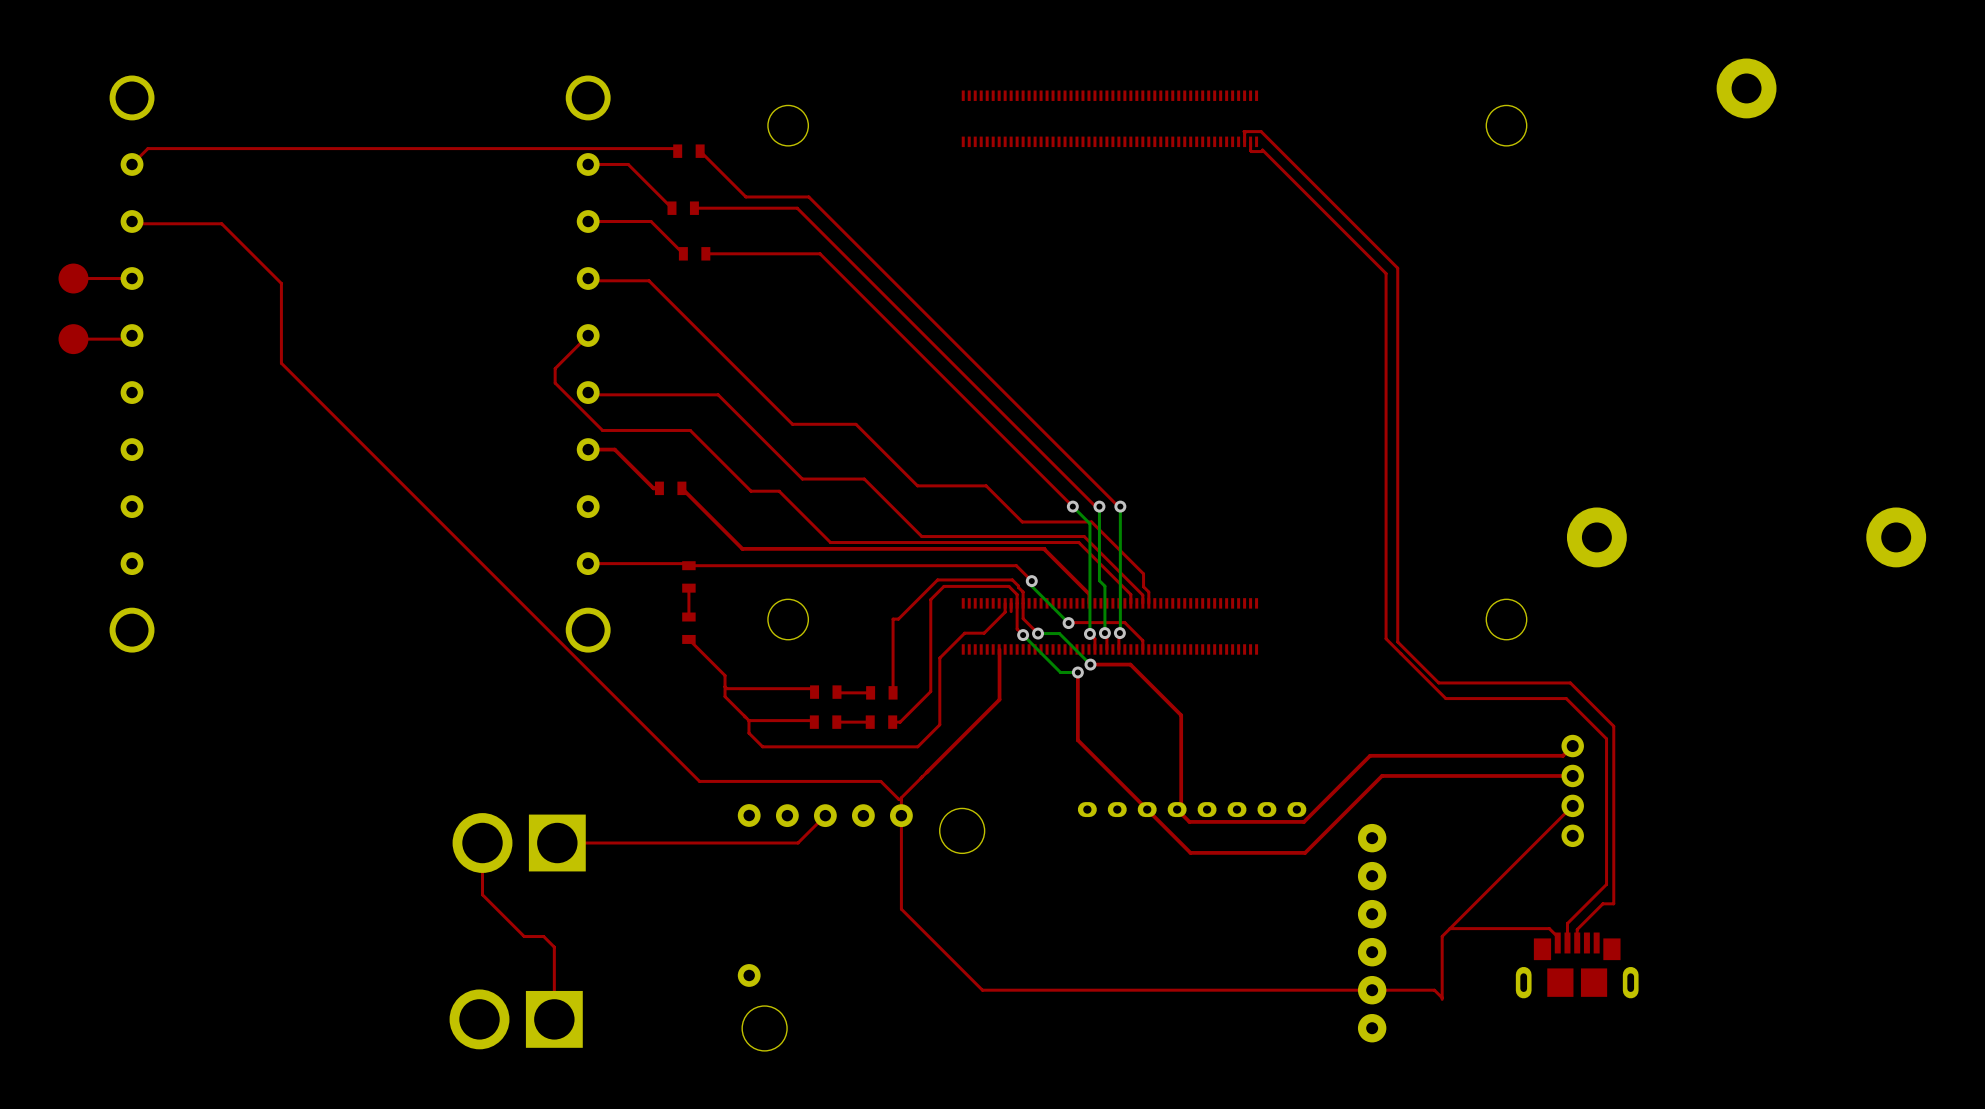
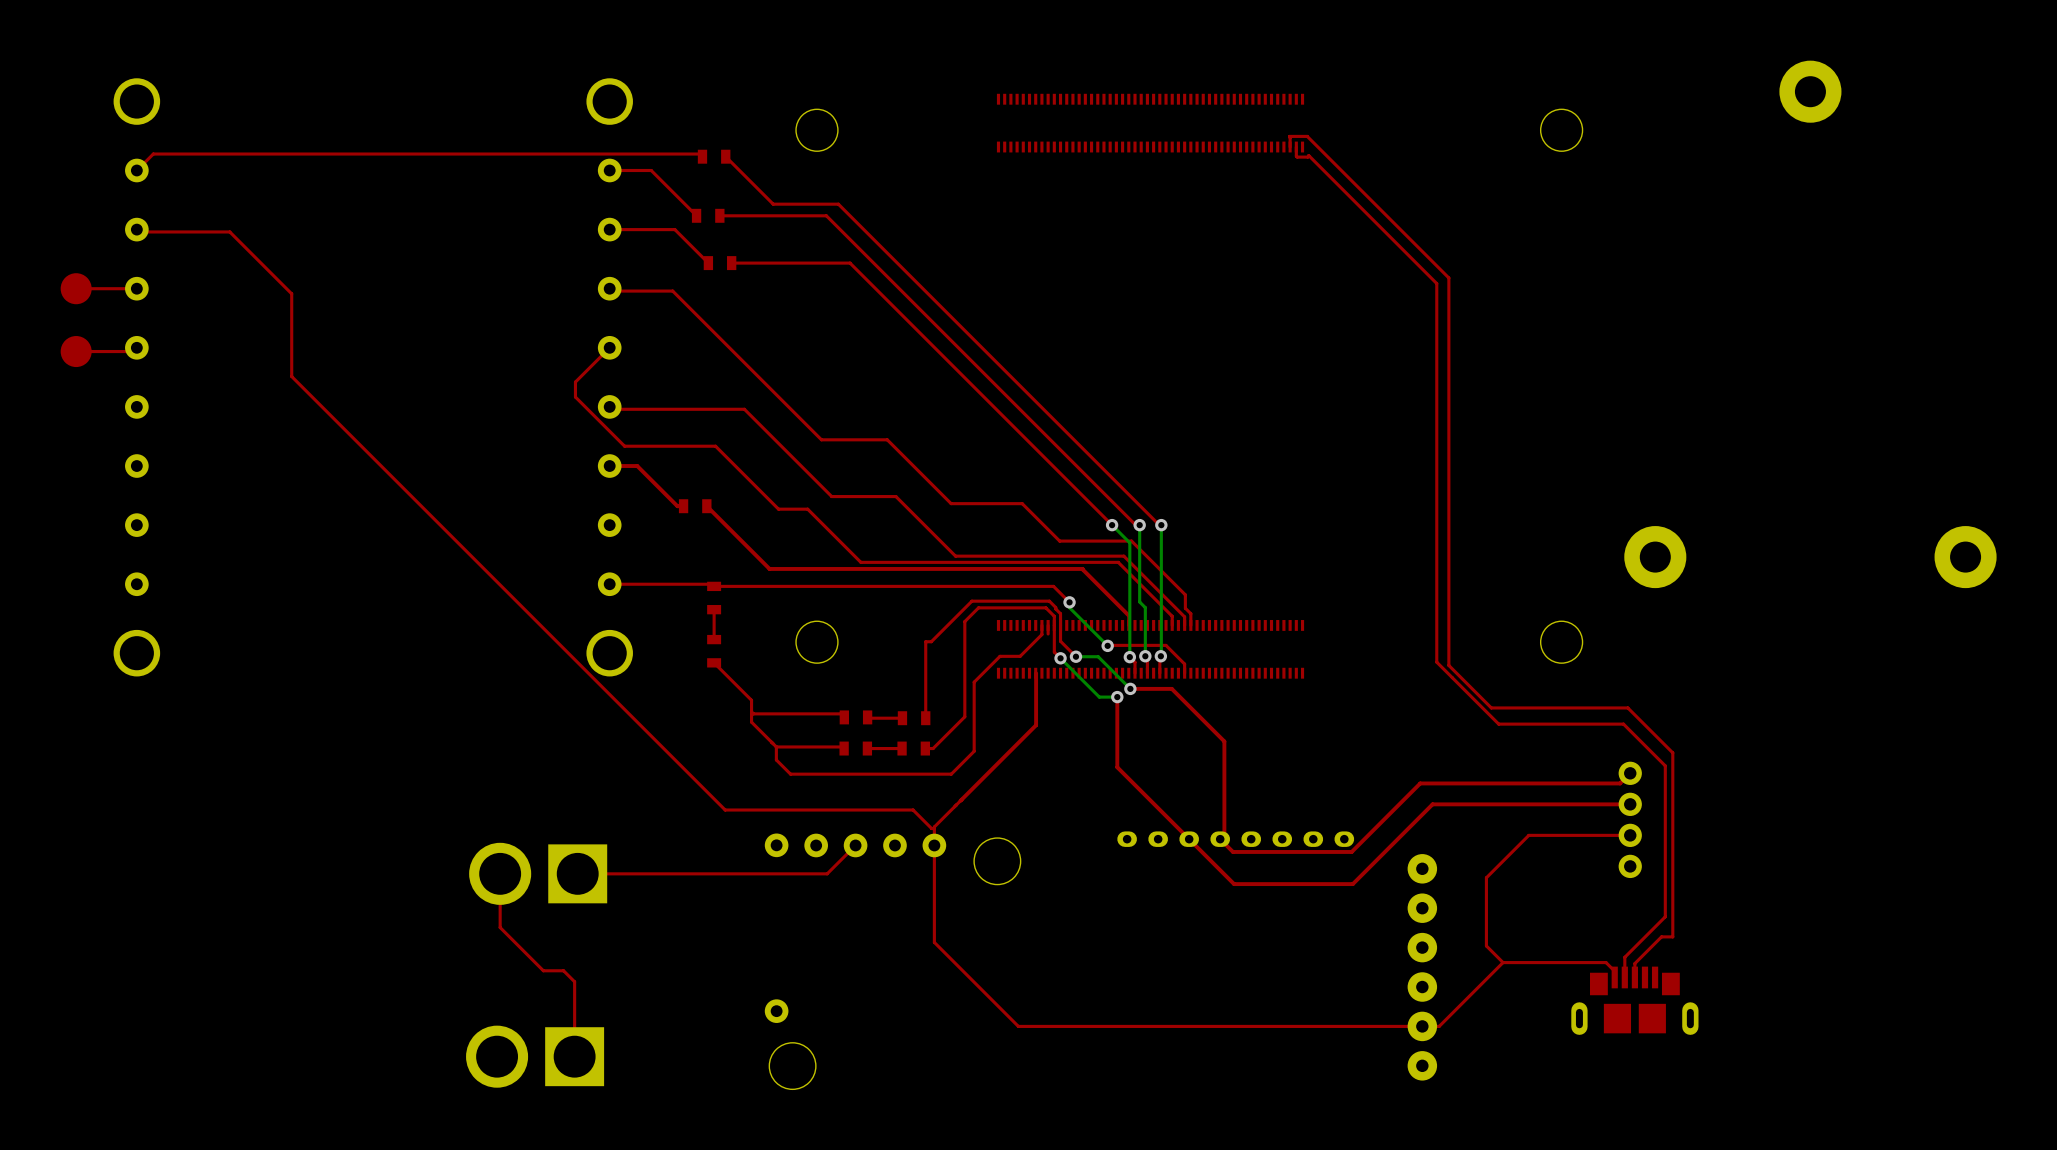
top track: (1572, 805) (1450, 928) -> (1630, 835) (1528, 835) (1486, 877) (1486, 945) (1503, 962)
top track: (1442, 936) (1442, 999) -> (1494, 970) (1439, 1026)
top track: (1388, 990) (1434, 990) (1442, 997) -> none

